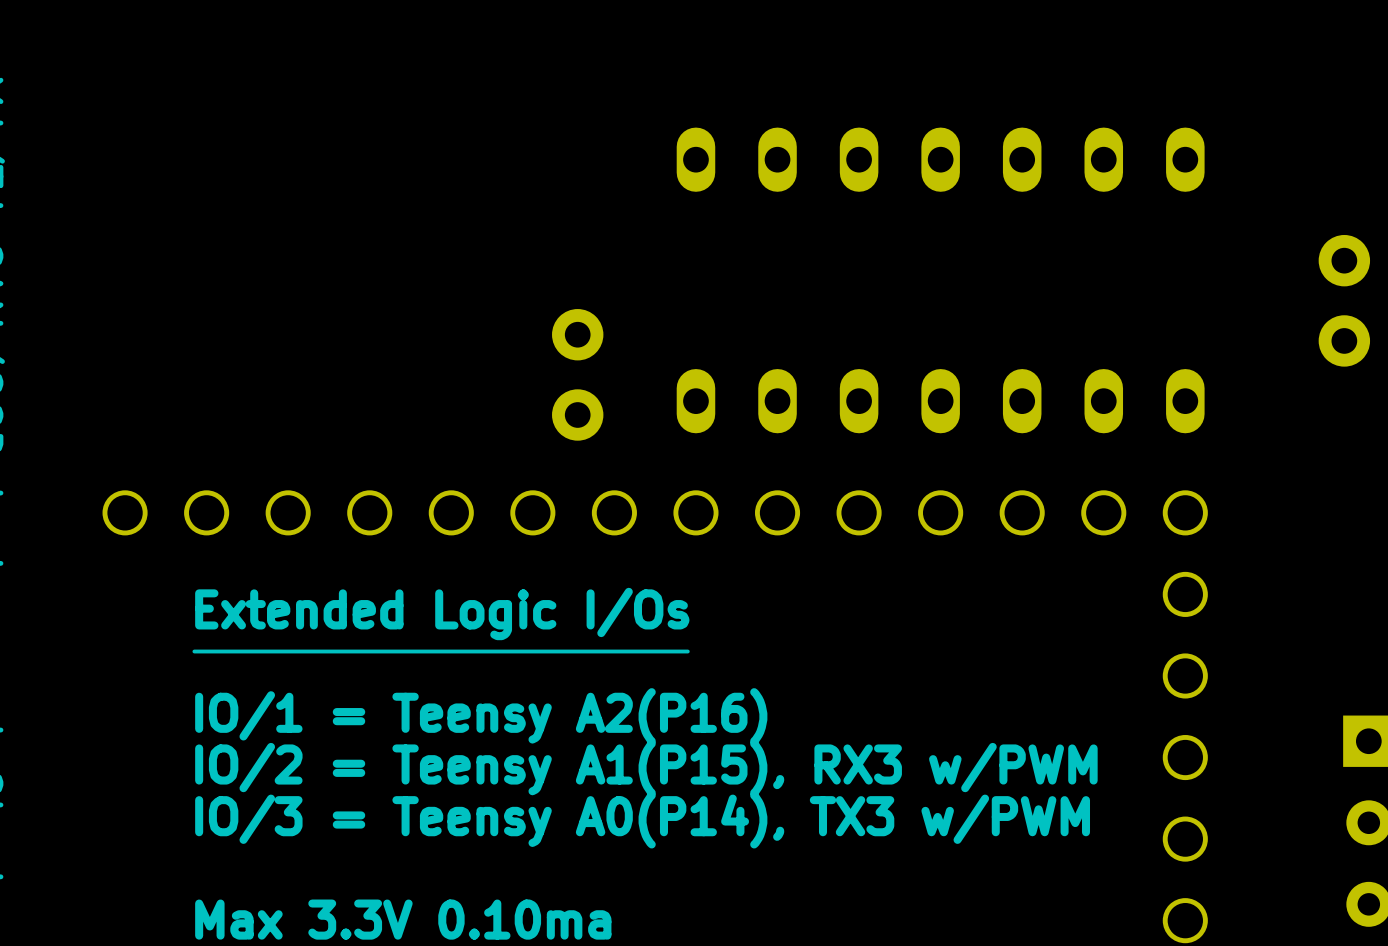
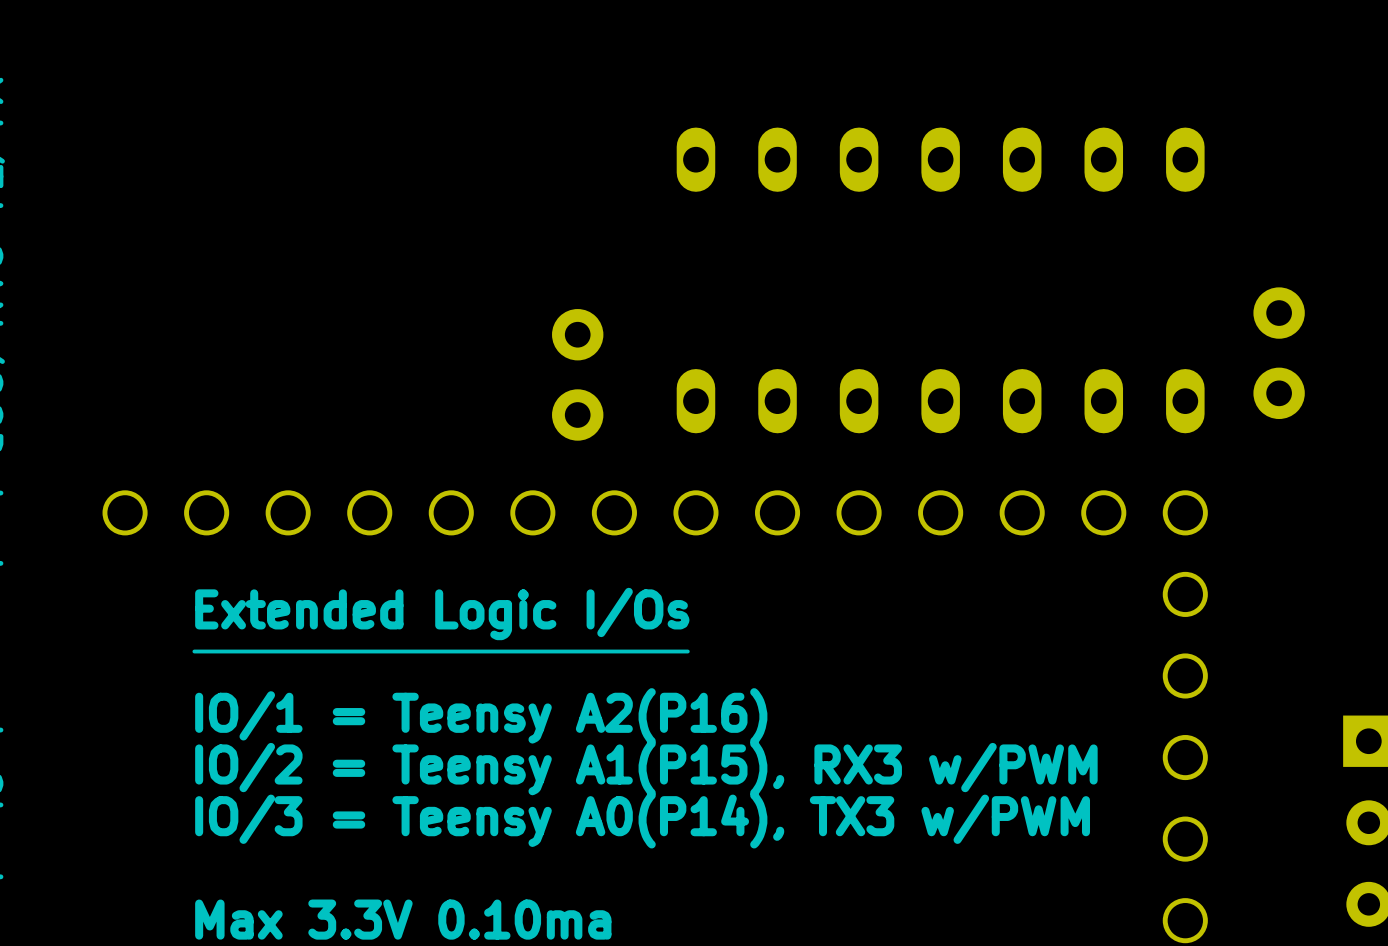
part position: (1344, 300) -> (1279, 353)

